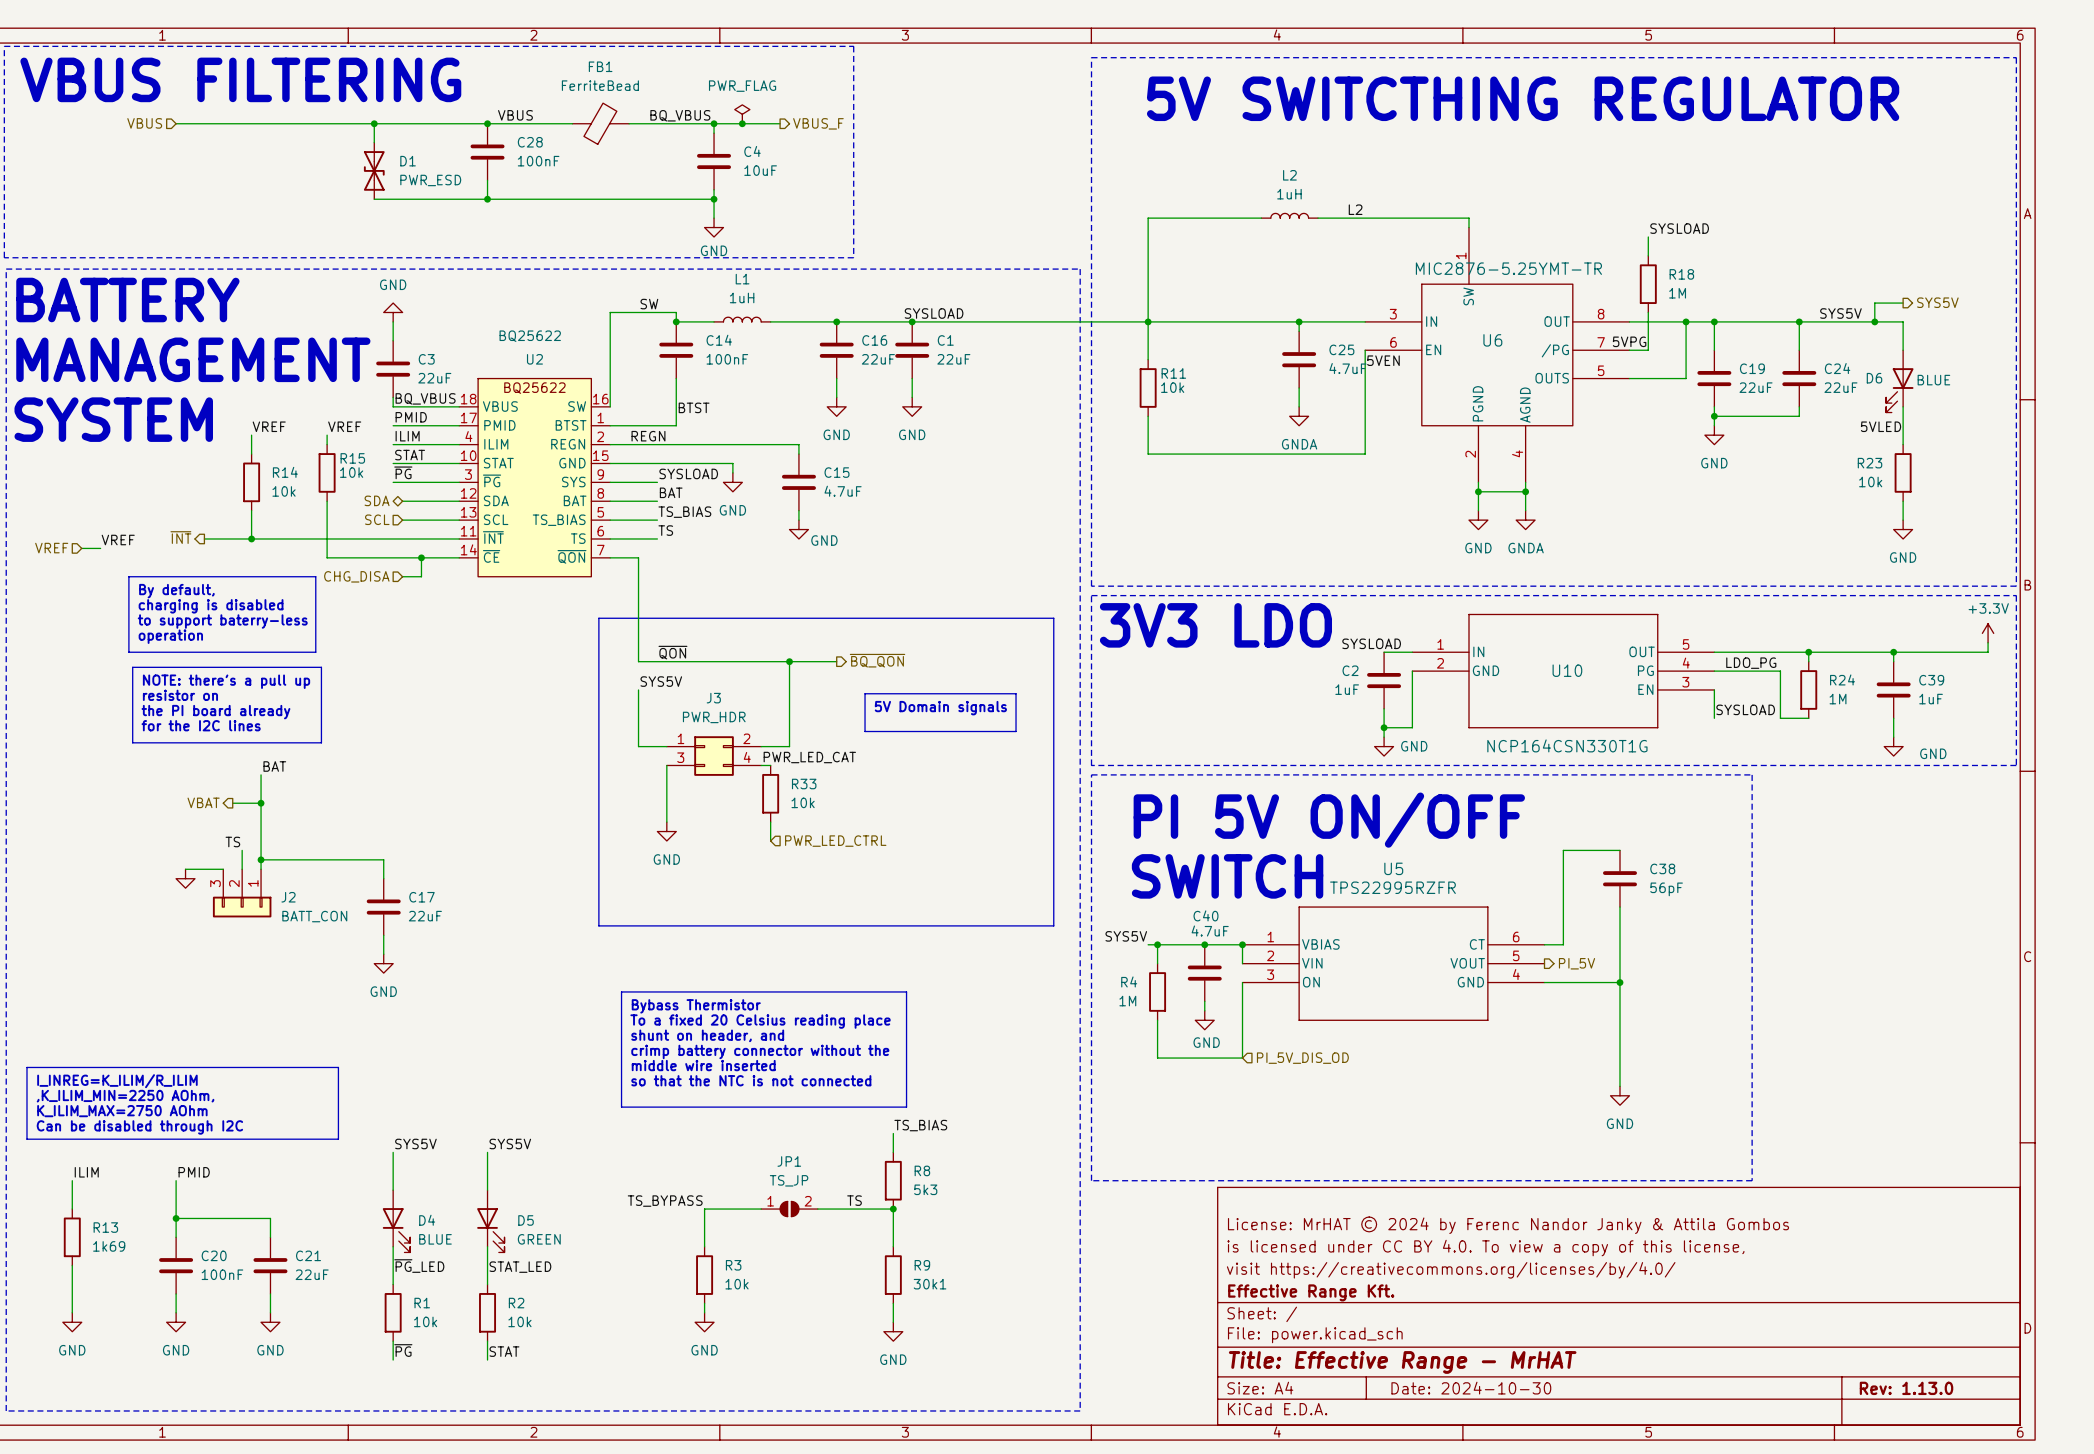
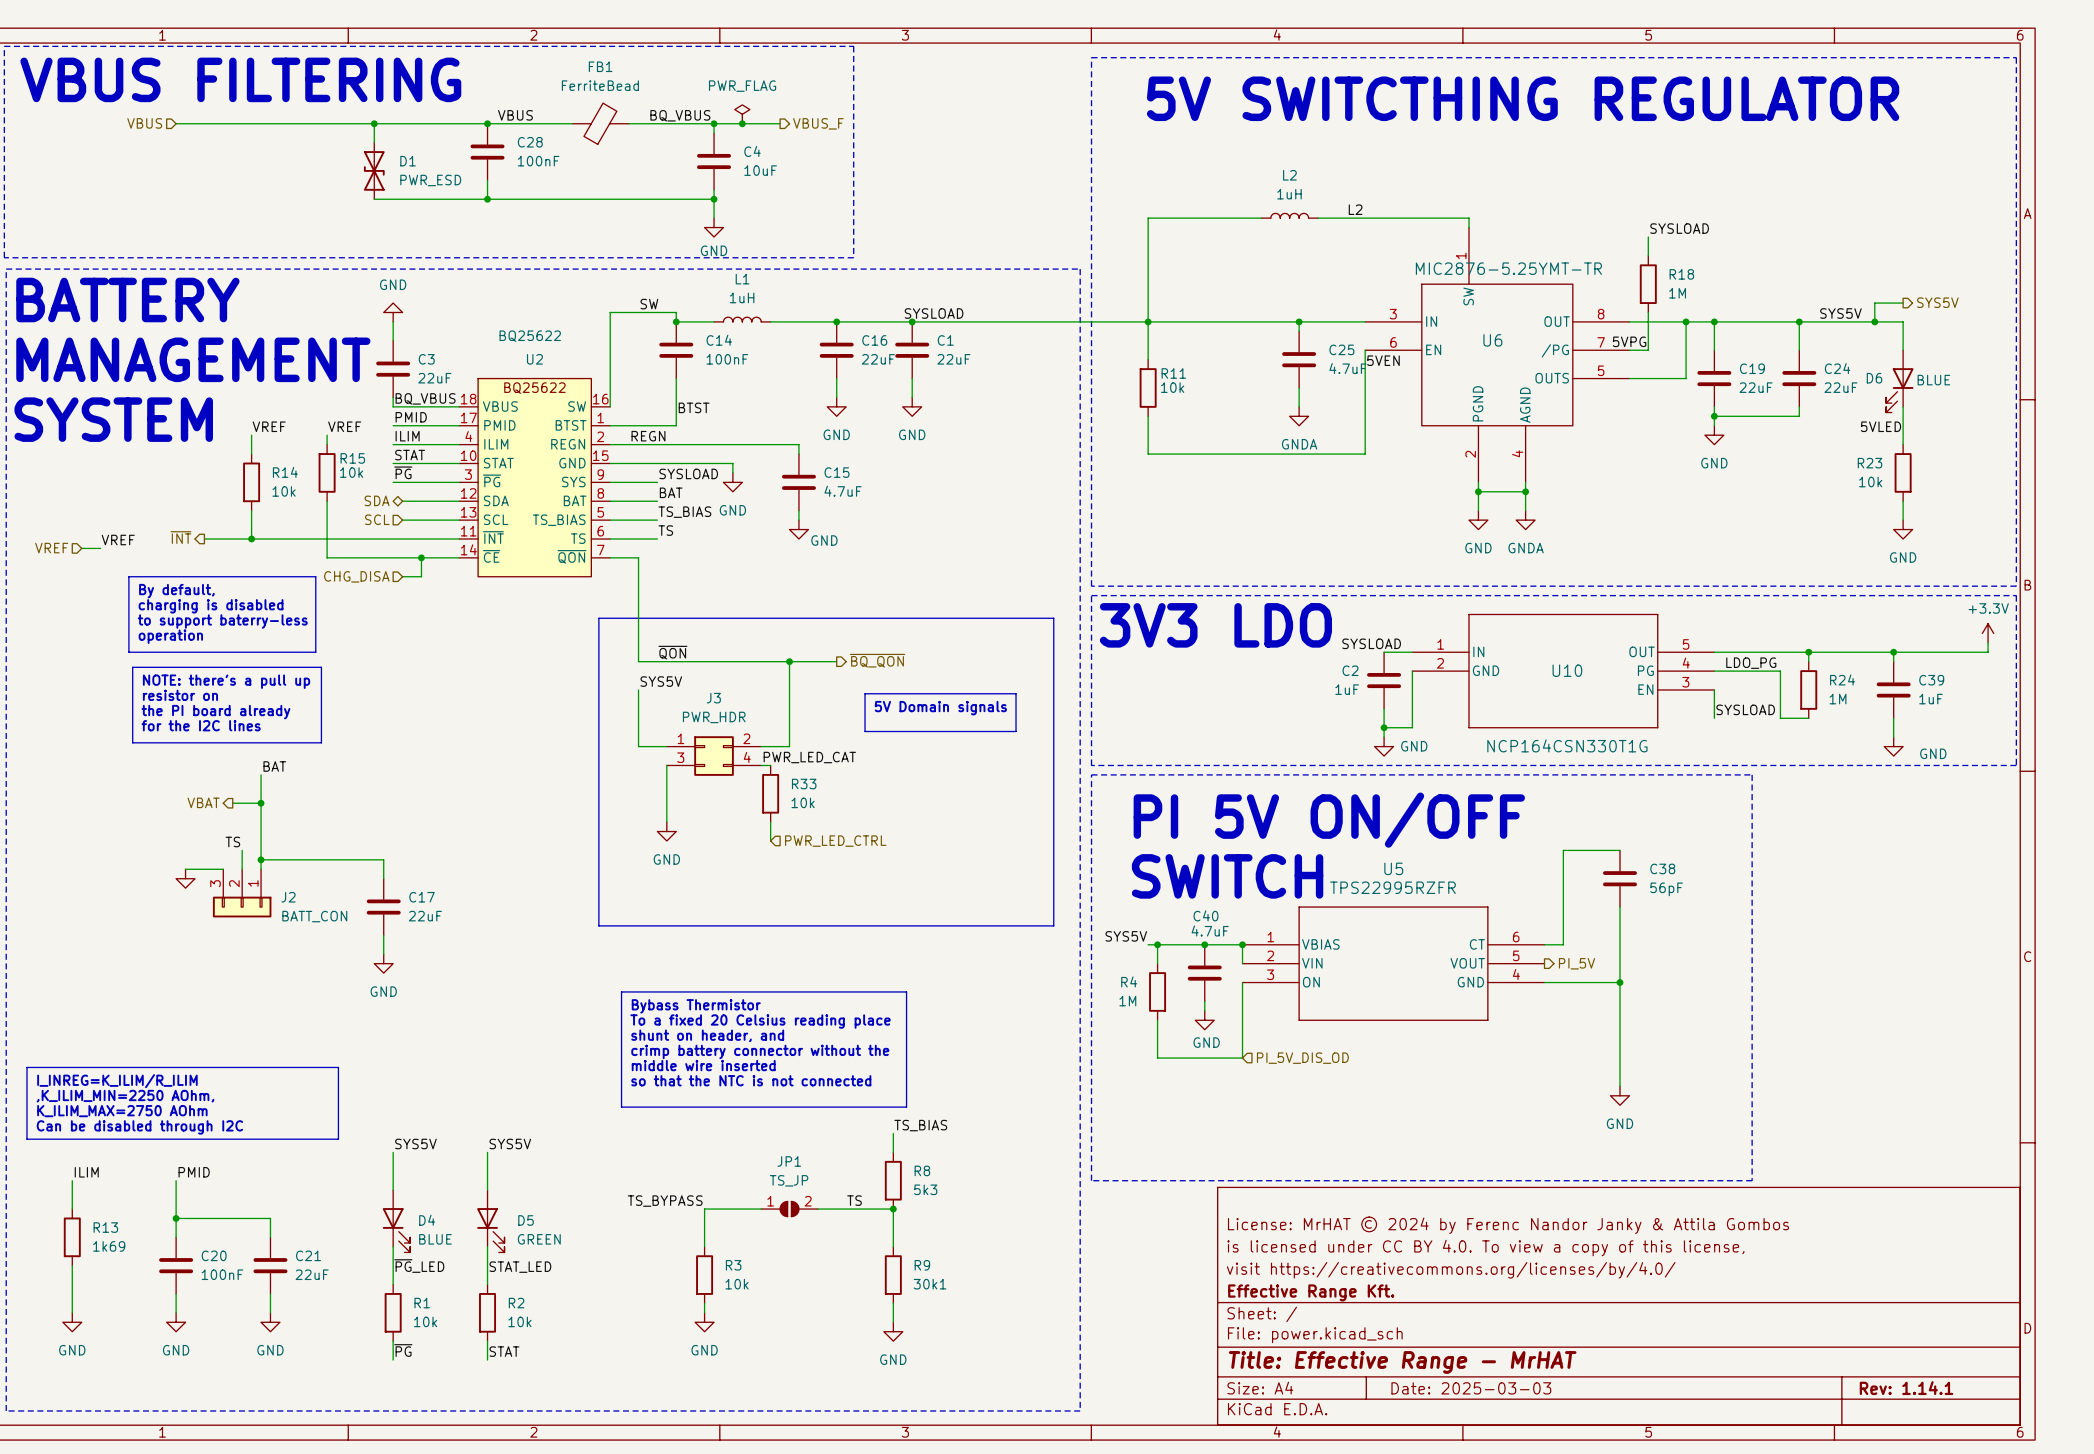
title block: Date: 2024-10-30 (1471, 1388) -> Date: 2025-03-03 (1471, 1388)
title block: Rev: 1.13.0 (1906, 1388) -> Rev: 1.14.1 (1906, 1388)

